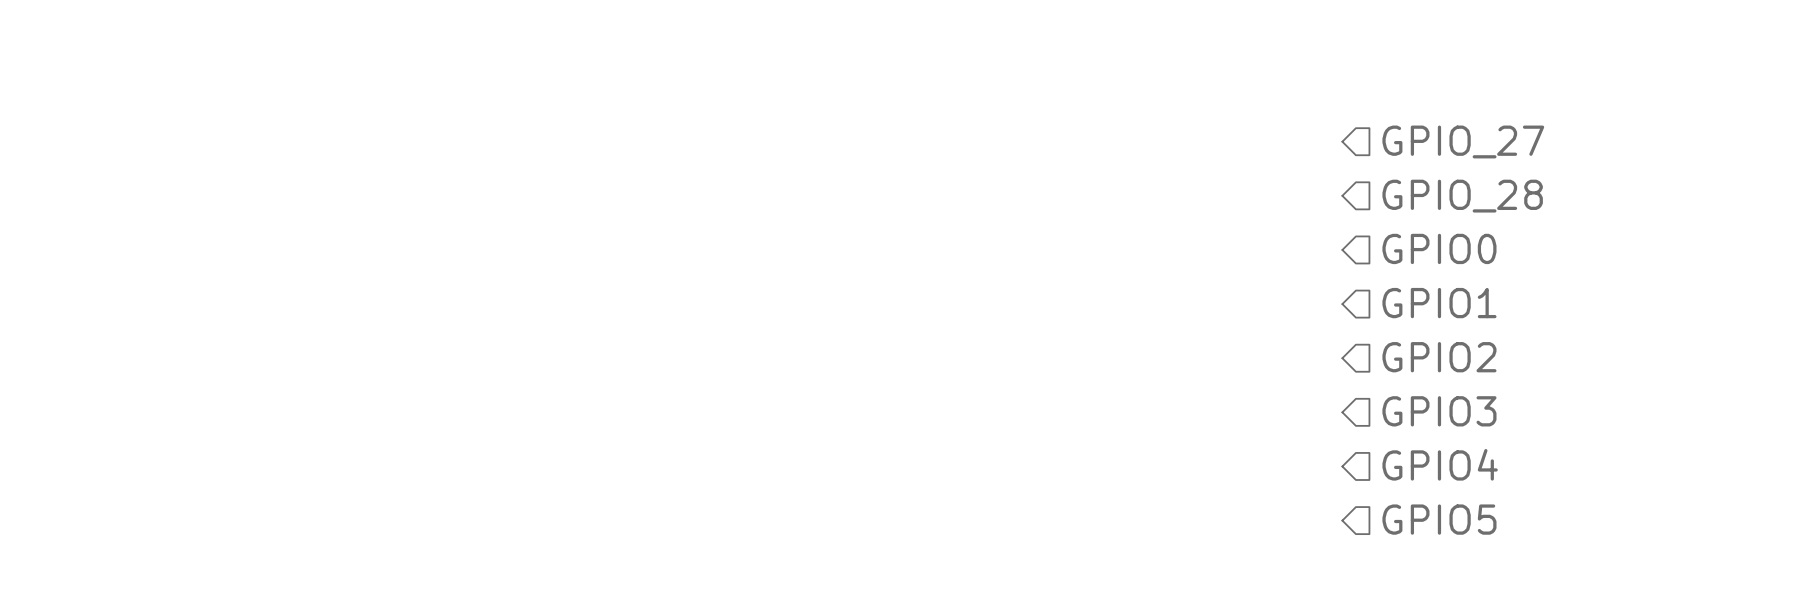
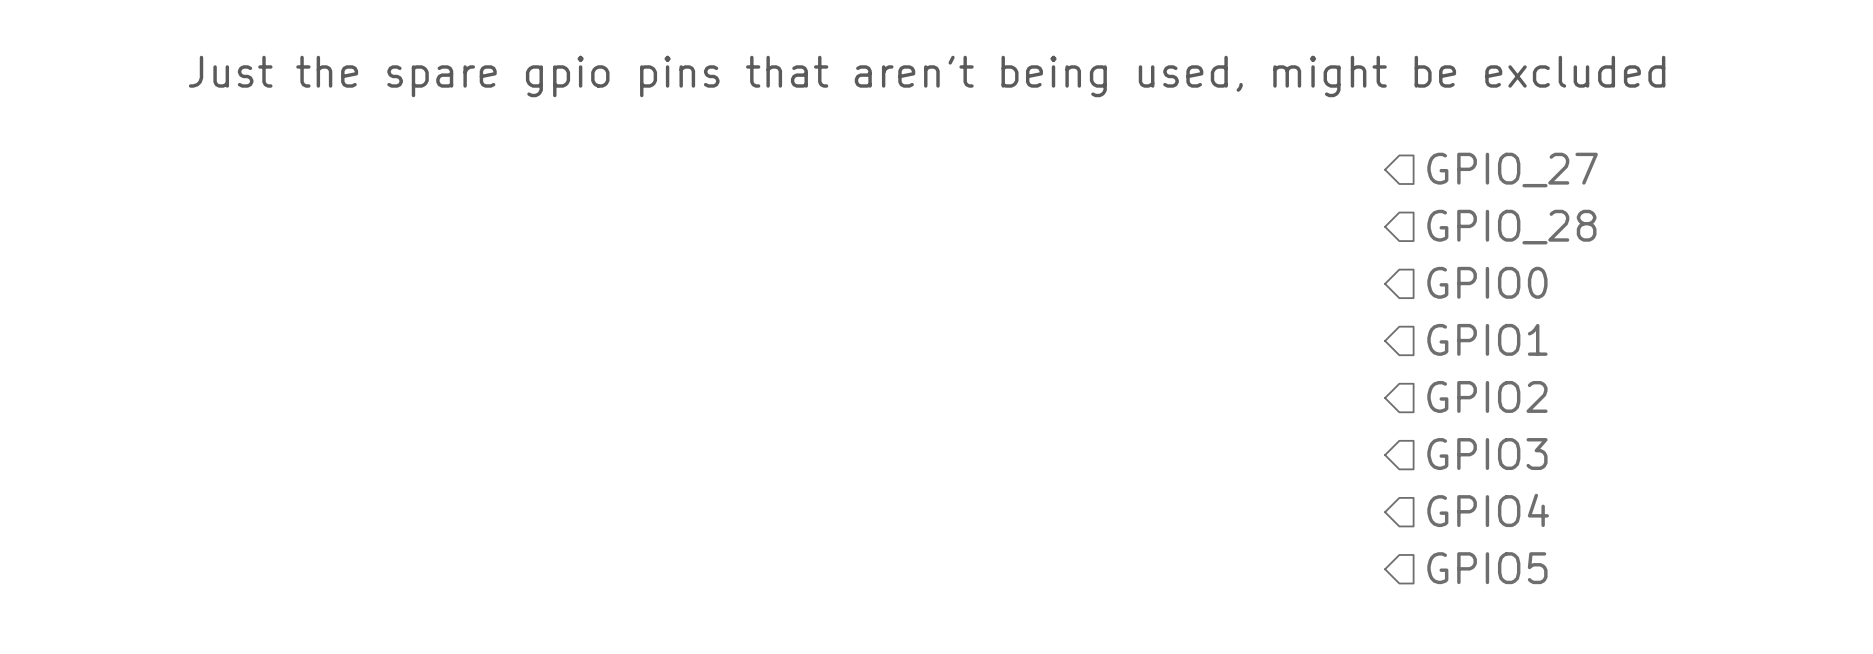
text: none -> Just the spare gpio pins that aren't being used, might be excluded (927, 76)

